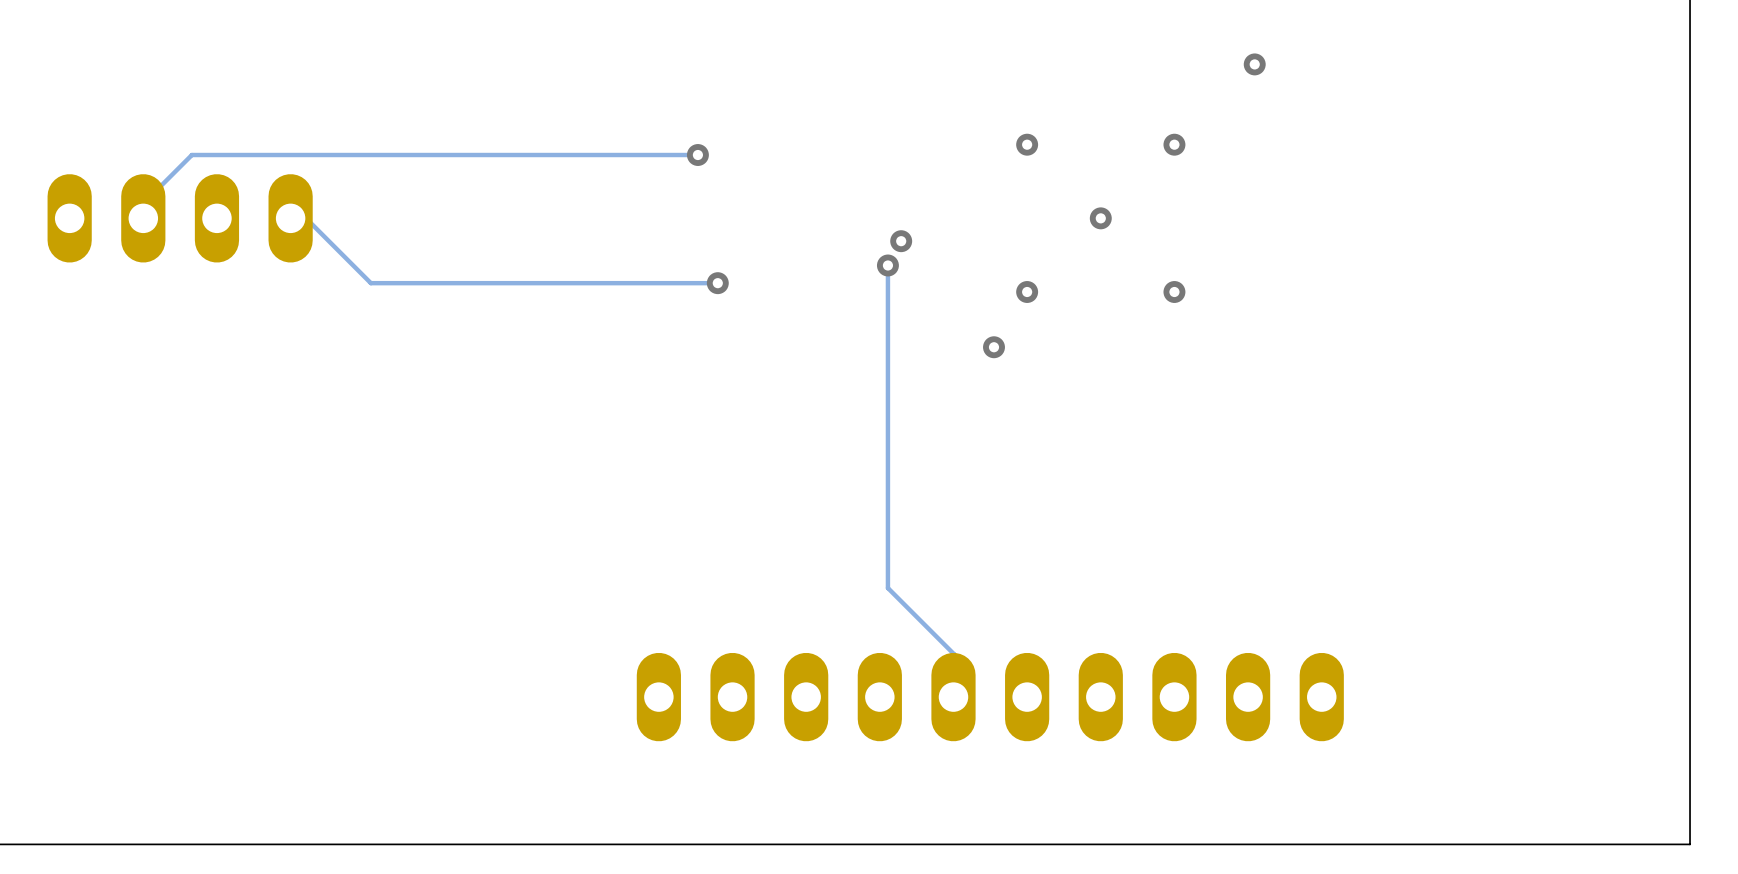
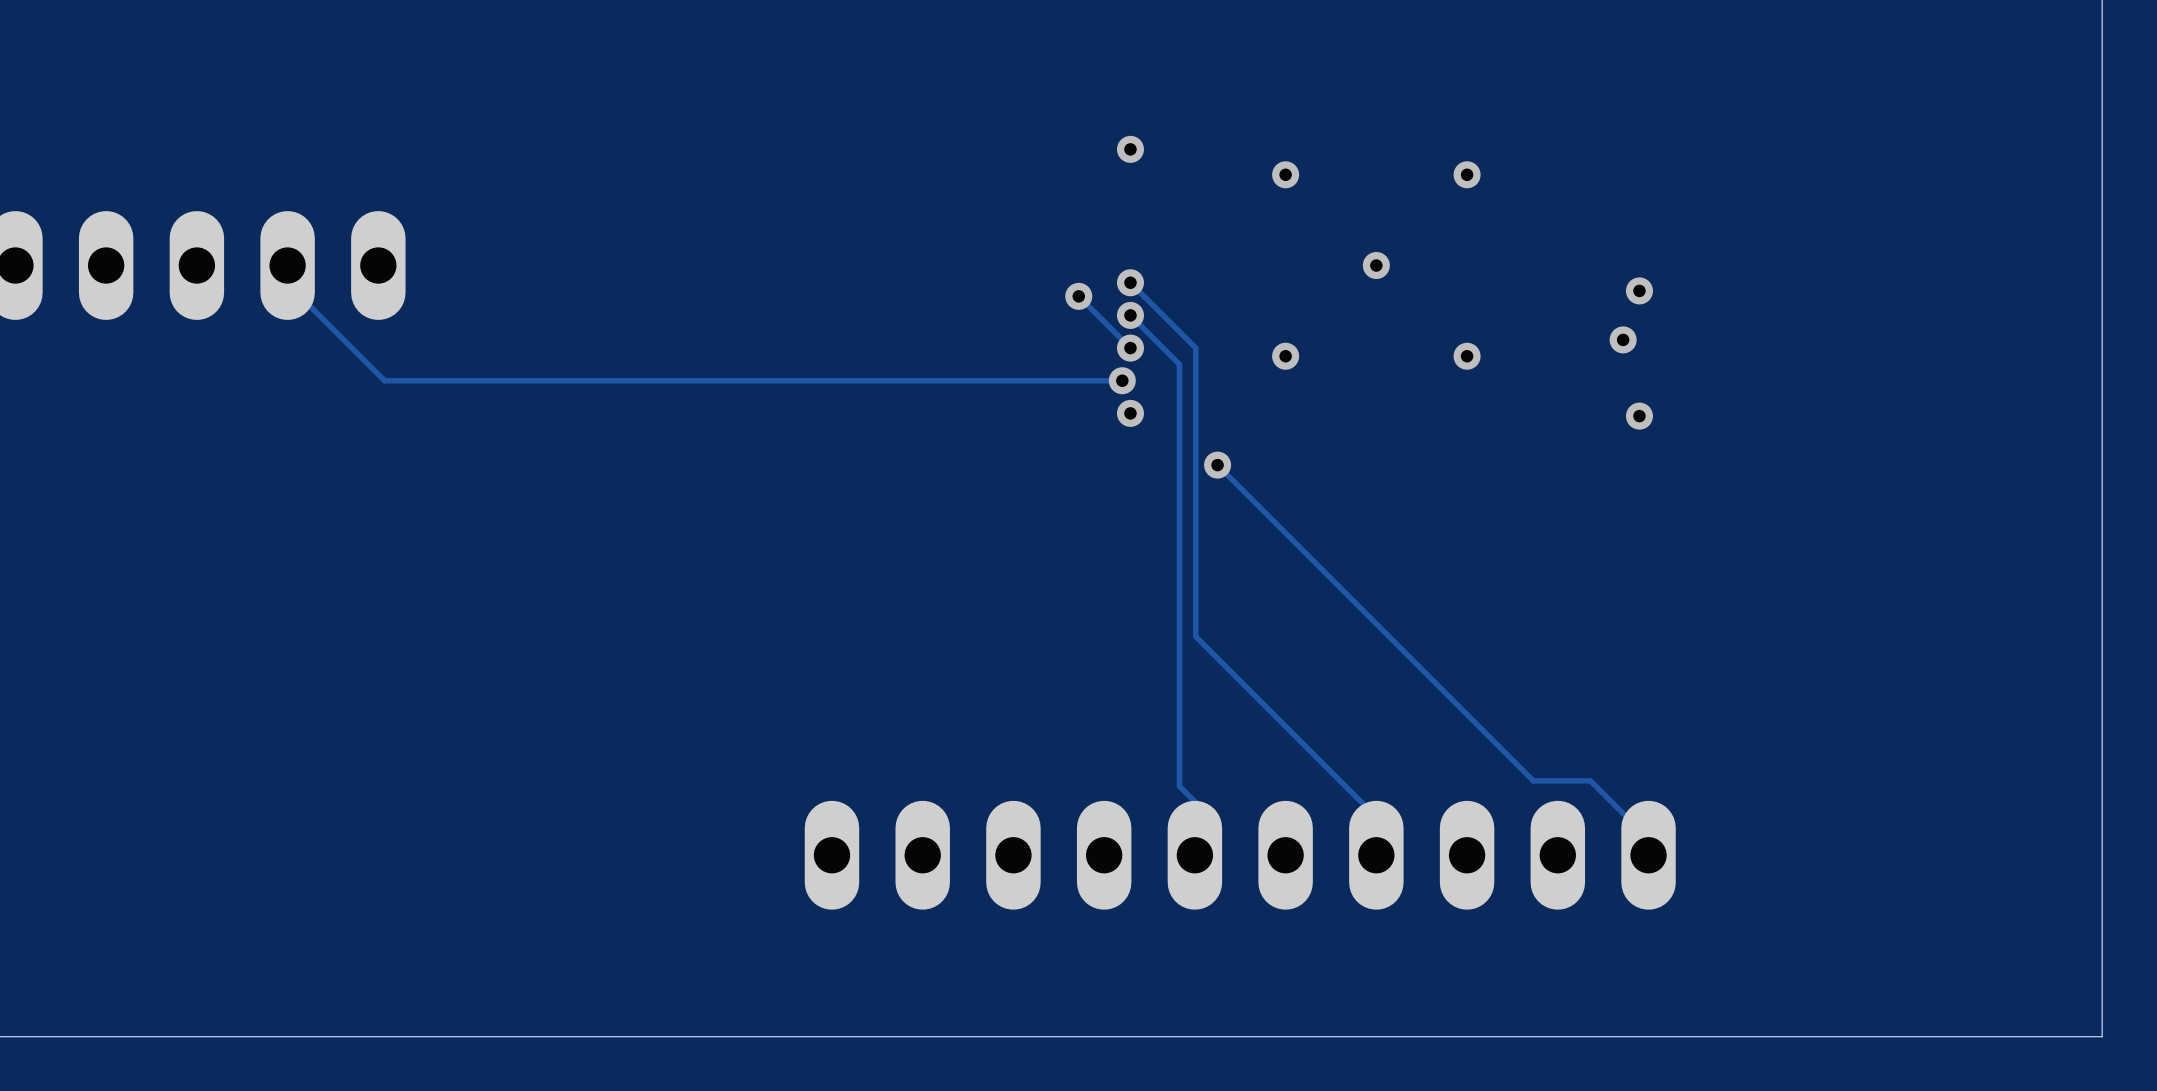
via: (1254, 64) -> none
via: none -> (1130, 149)
track: (697, 155) (191, 155) (143, 203) (143, 218) -> none
via: (697, 155) -> none
track: none -> (287, 265) (289, 266) (289, 285) (384, 380) (1122, 380)
track: (290, 218) (306, 219) (370, 283) (717, 283) -> none
track: none -> (1130, 282) (1195, 348) (1195, 636) (1375, 816) (1376, 855)
via: none -> (1130, 282)
via: none -> (1639, 290)
via: (901, 241) -> none
track: none -> (1078, 296) (1130, 348)
via: none -> (1078, 296)
via: none -> (1130, 315)
track: (887, 265) (887, 588) (940, 641) -> (1130, 315) (1179, 364) (1179, 786)
via: (887, 265) -> none
via: none -> (1623, 339)
via: (717, 283) -> none
via: none -> (1130, 348)
via: none -> (1122, 380)
via: none -> (1130, 413)
via: none -> (1639, 416)
via position: (993, 347) -> (1217, 465)
track: none -> (1217, 465) (1533, 780) (1590, 780) (1647, 838) (1648, 855)

